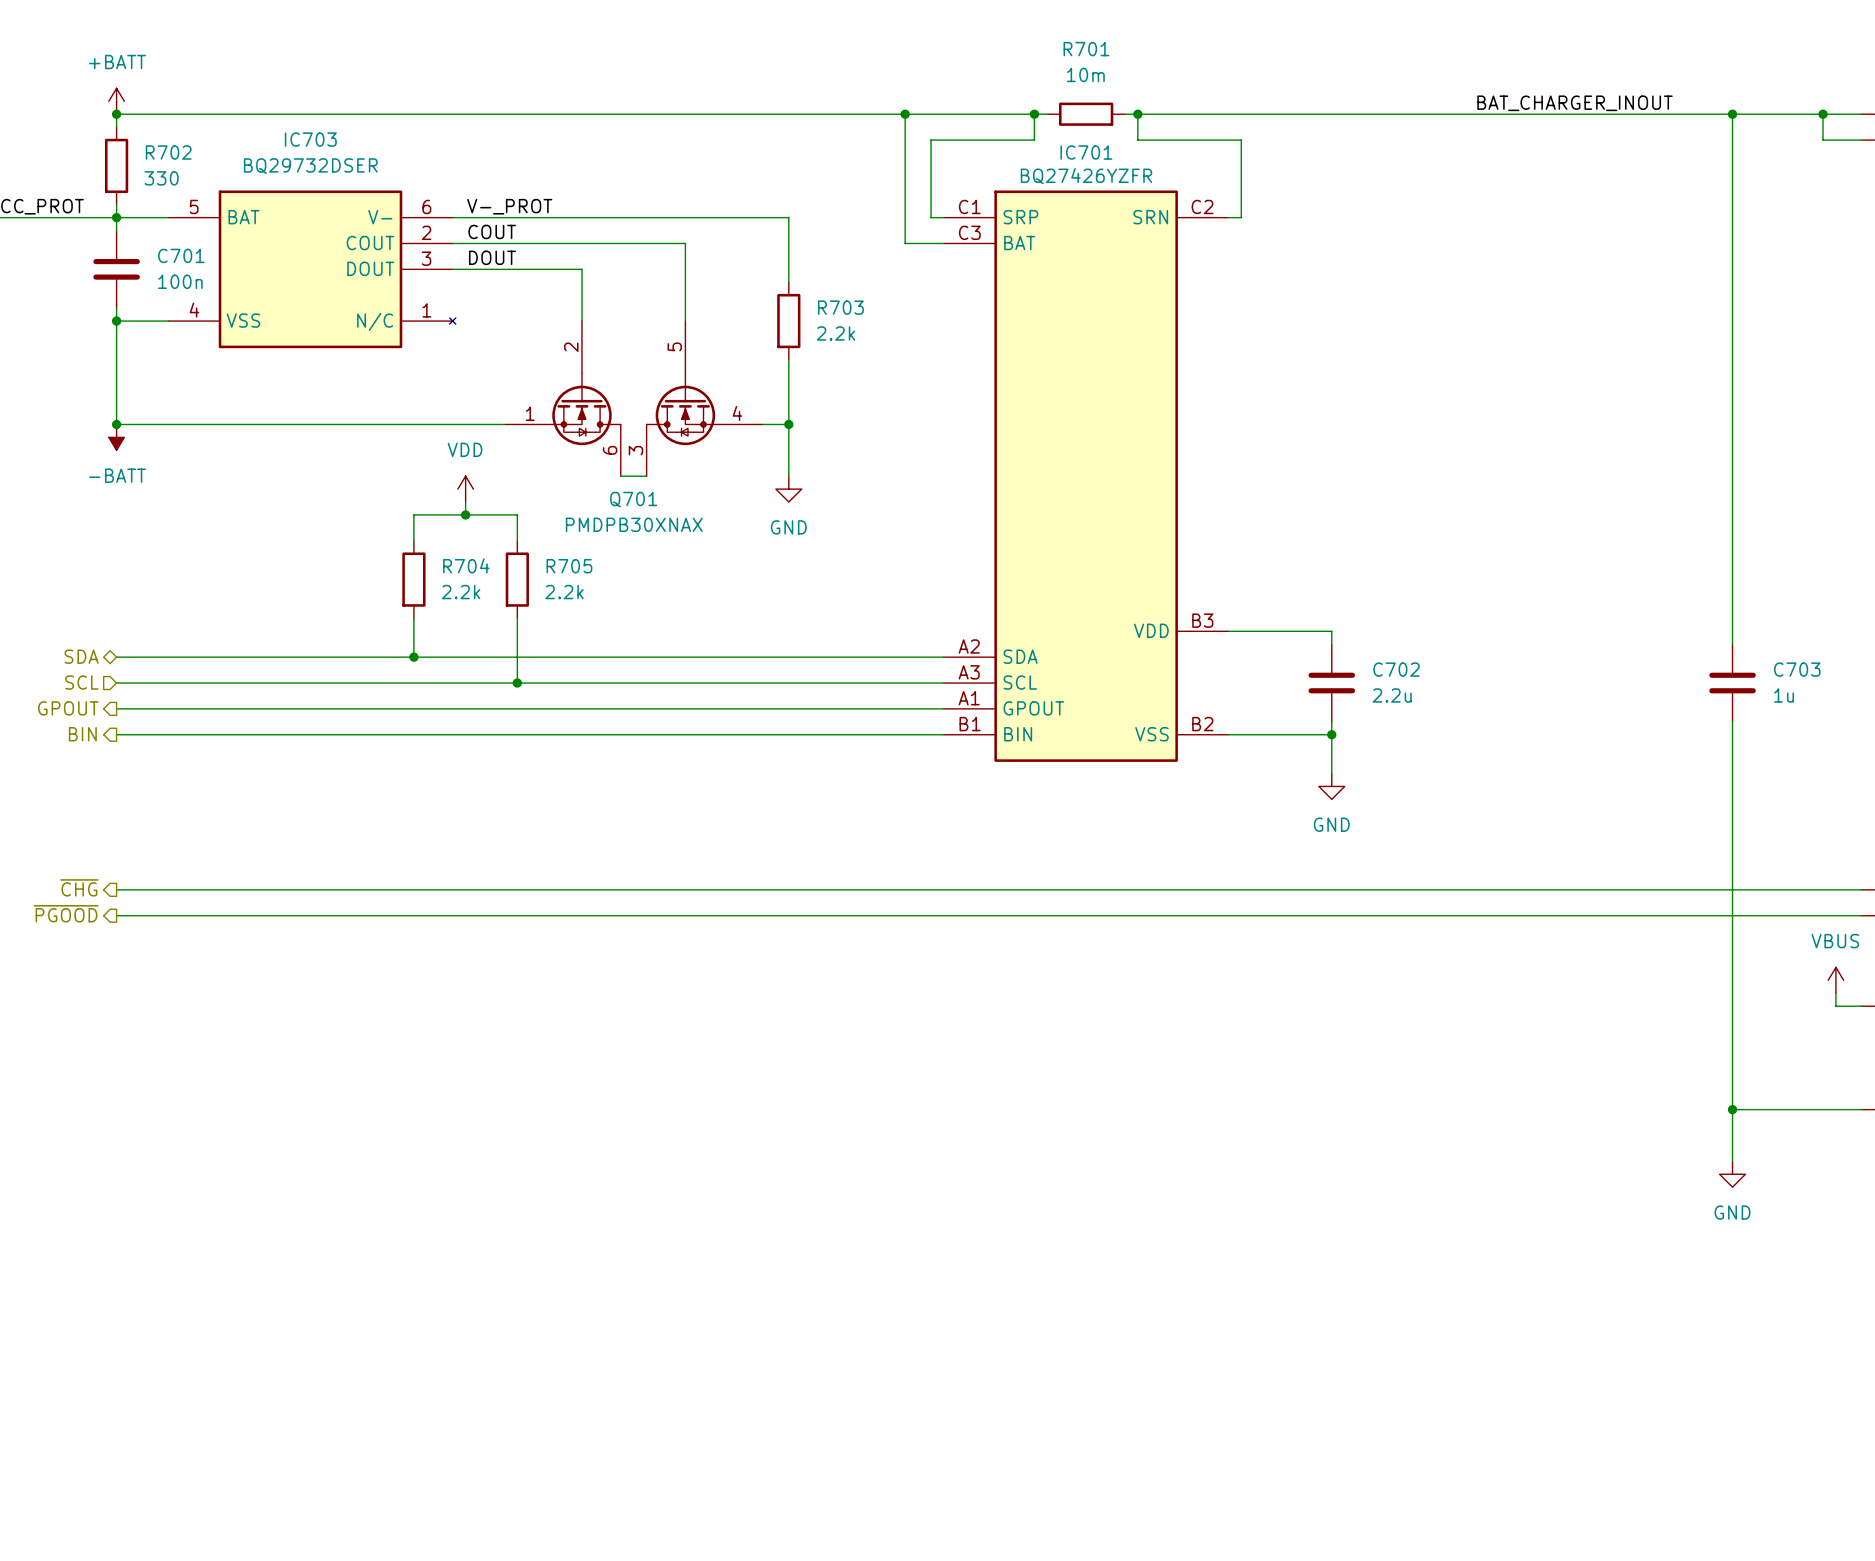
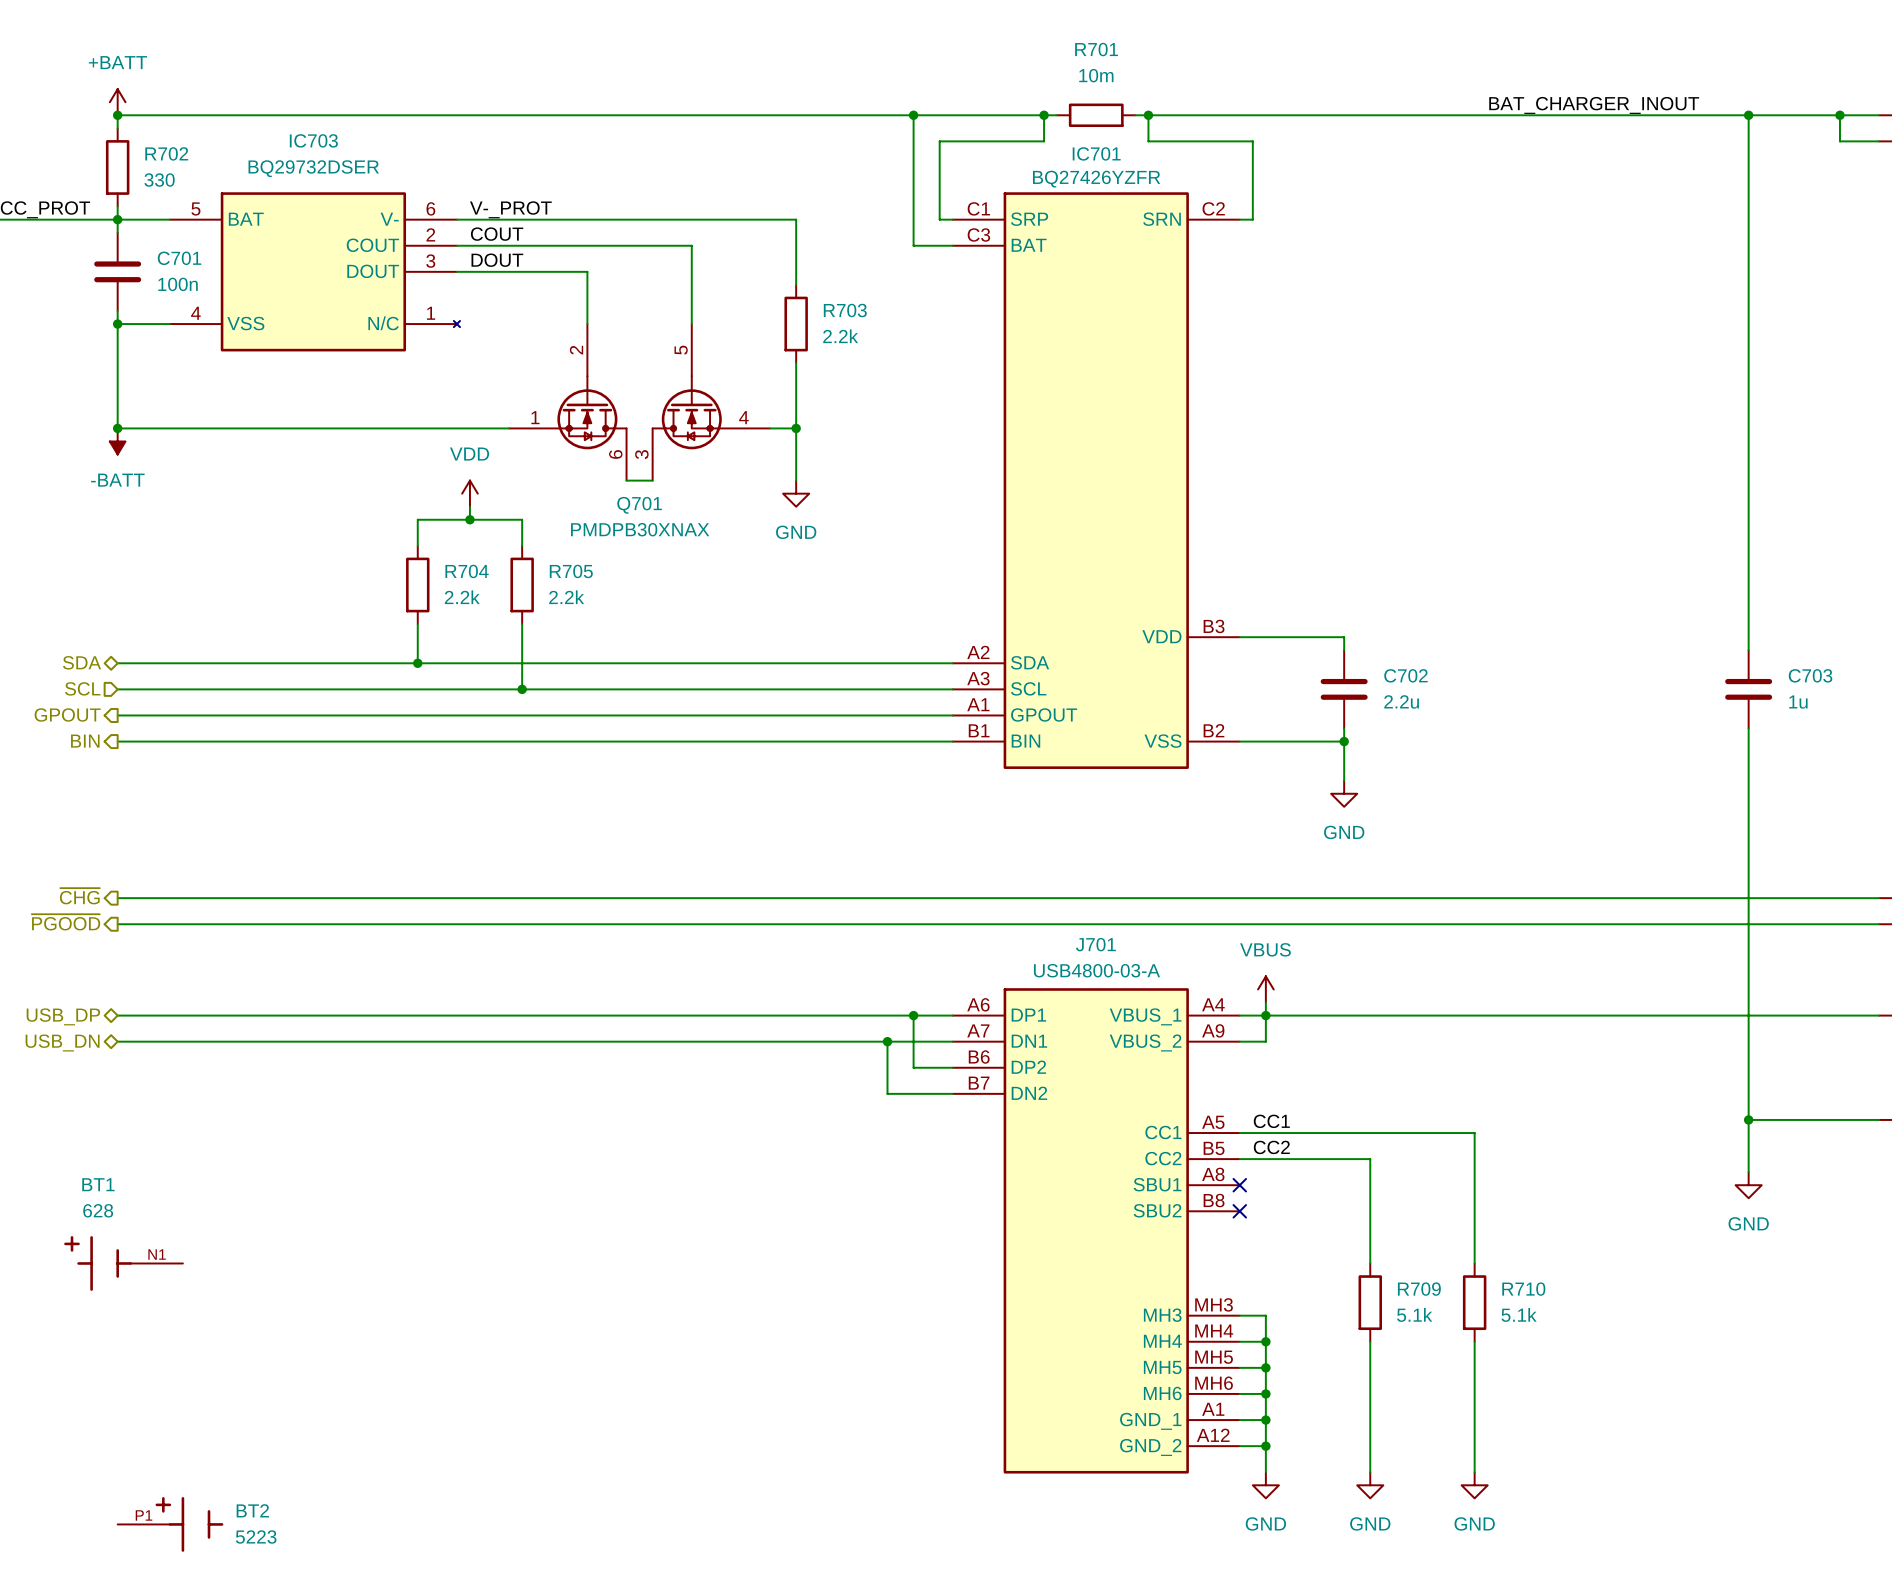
power symbol: none -> VBUS (1265, 989)
power symbol: VBUS (1835, 980) -> none
wire: none -> (1265, 1002) (1265, 1041) (1239, 1041)
wire: (1835, 993) (1835, 1006) -> (1239, 1015) (1853, 1015)
hierarchical label: none -> USB_DP (63, 1016)
wire: none -> (117, 1015) (952, 1015)
wire: none -> (913, 1015) (913, 1067) (952, 1067)
junction: none -> (913, 1015)
junction: none -> (1265, 1015)
hierarchical label: none -> USB_DN (62, 1042)
wire: none -> (117, 1041) (952, 1041)
wire: none -> (887, 1041) (887, 1093) (952, 1093)
junction: none -> (887, 1041)
label: none -> CC1 (1271, 1121)
wire: none -> (1239, 1133) (1474, 1133) (1474, 1263)
label: none -> CC2 (1271, 1147)
wire: none -> (1239, 1159) (1370, 1159) (1370, 1263)
no-connect mark: none -> (1239, 1185)
no-connect mark: none -> (1239, 1211)
J701: none -> USB4800-03-A (1096, 1230)
BT1: none -> 628 (123, 1263)
R709: none -> 5.1k (1370, 1302)
R710: none -> 5.1k (1474, 1302)
wire: none -> (1239, 1315) (1265, 1315) (1265, 1472)
wire: none -> (1239, 1341) (1265, 1341)
junction: none -> (1265, 1341)
wire: none -> (1370, 1341) (1370, 1472)
wire: none -> (1474, 1341) (1474, 1472)
wire: none -> (1239, 1367) (1265, 1367)
junction: none -> (1265, 1367)
wire: none -> (1239, 1393) (1265, 1393)
junction: none -> (1265, 1393)
wire: none -> (1239, 1420) (1265, 1420)
junction: none -> (1265, 1420)
wire: none -> (1239, 1446) (1265, 1446)
junction: none -> (1265, 1446)
power symbol: none -> GND (1265, 1485)
power symbol: none -> GND (1370, 1485)
power symbol: none -> GND (1474, 1485)
BT2: none -> 5223 (170, 1524)

